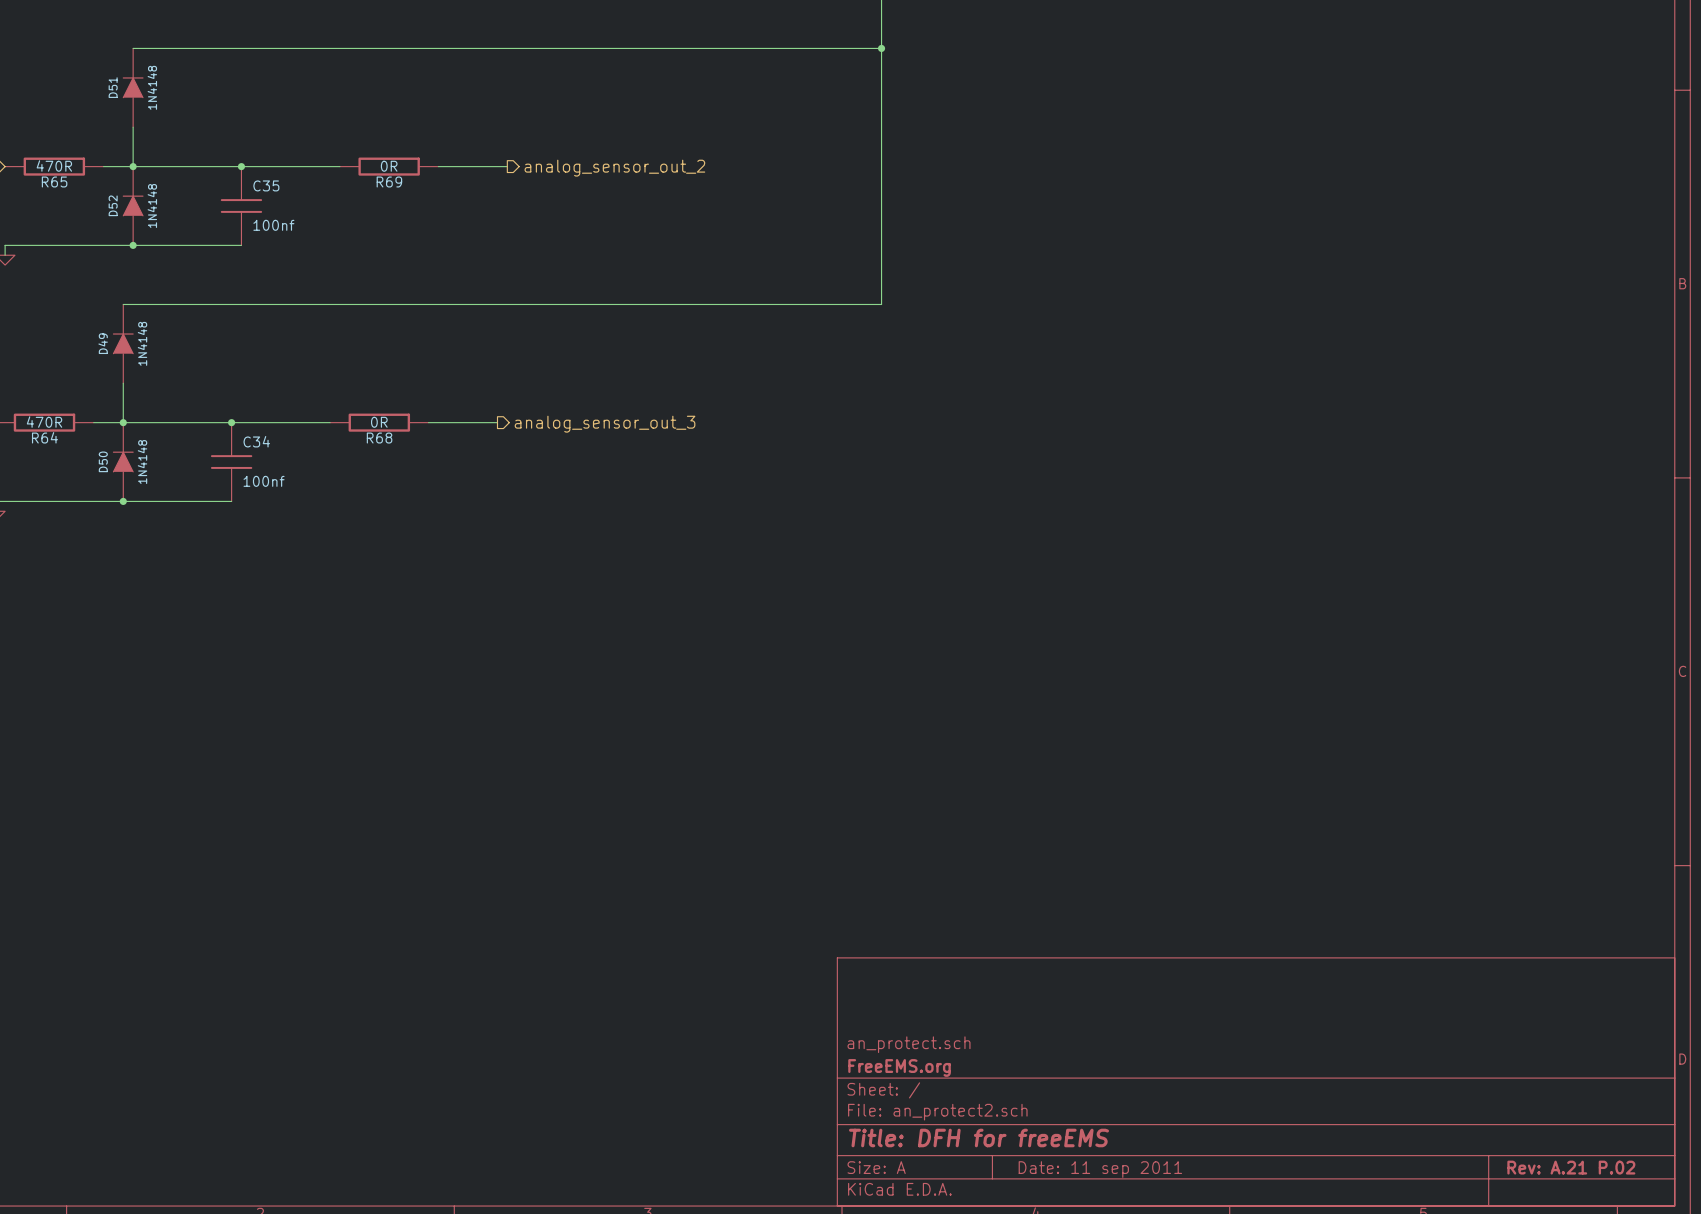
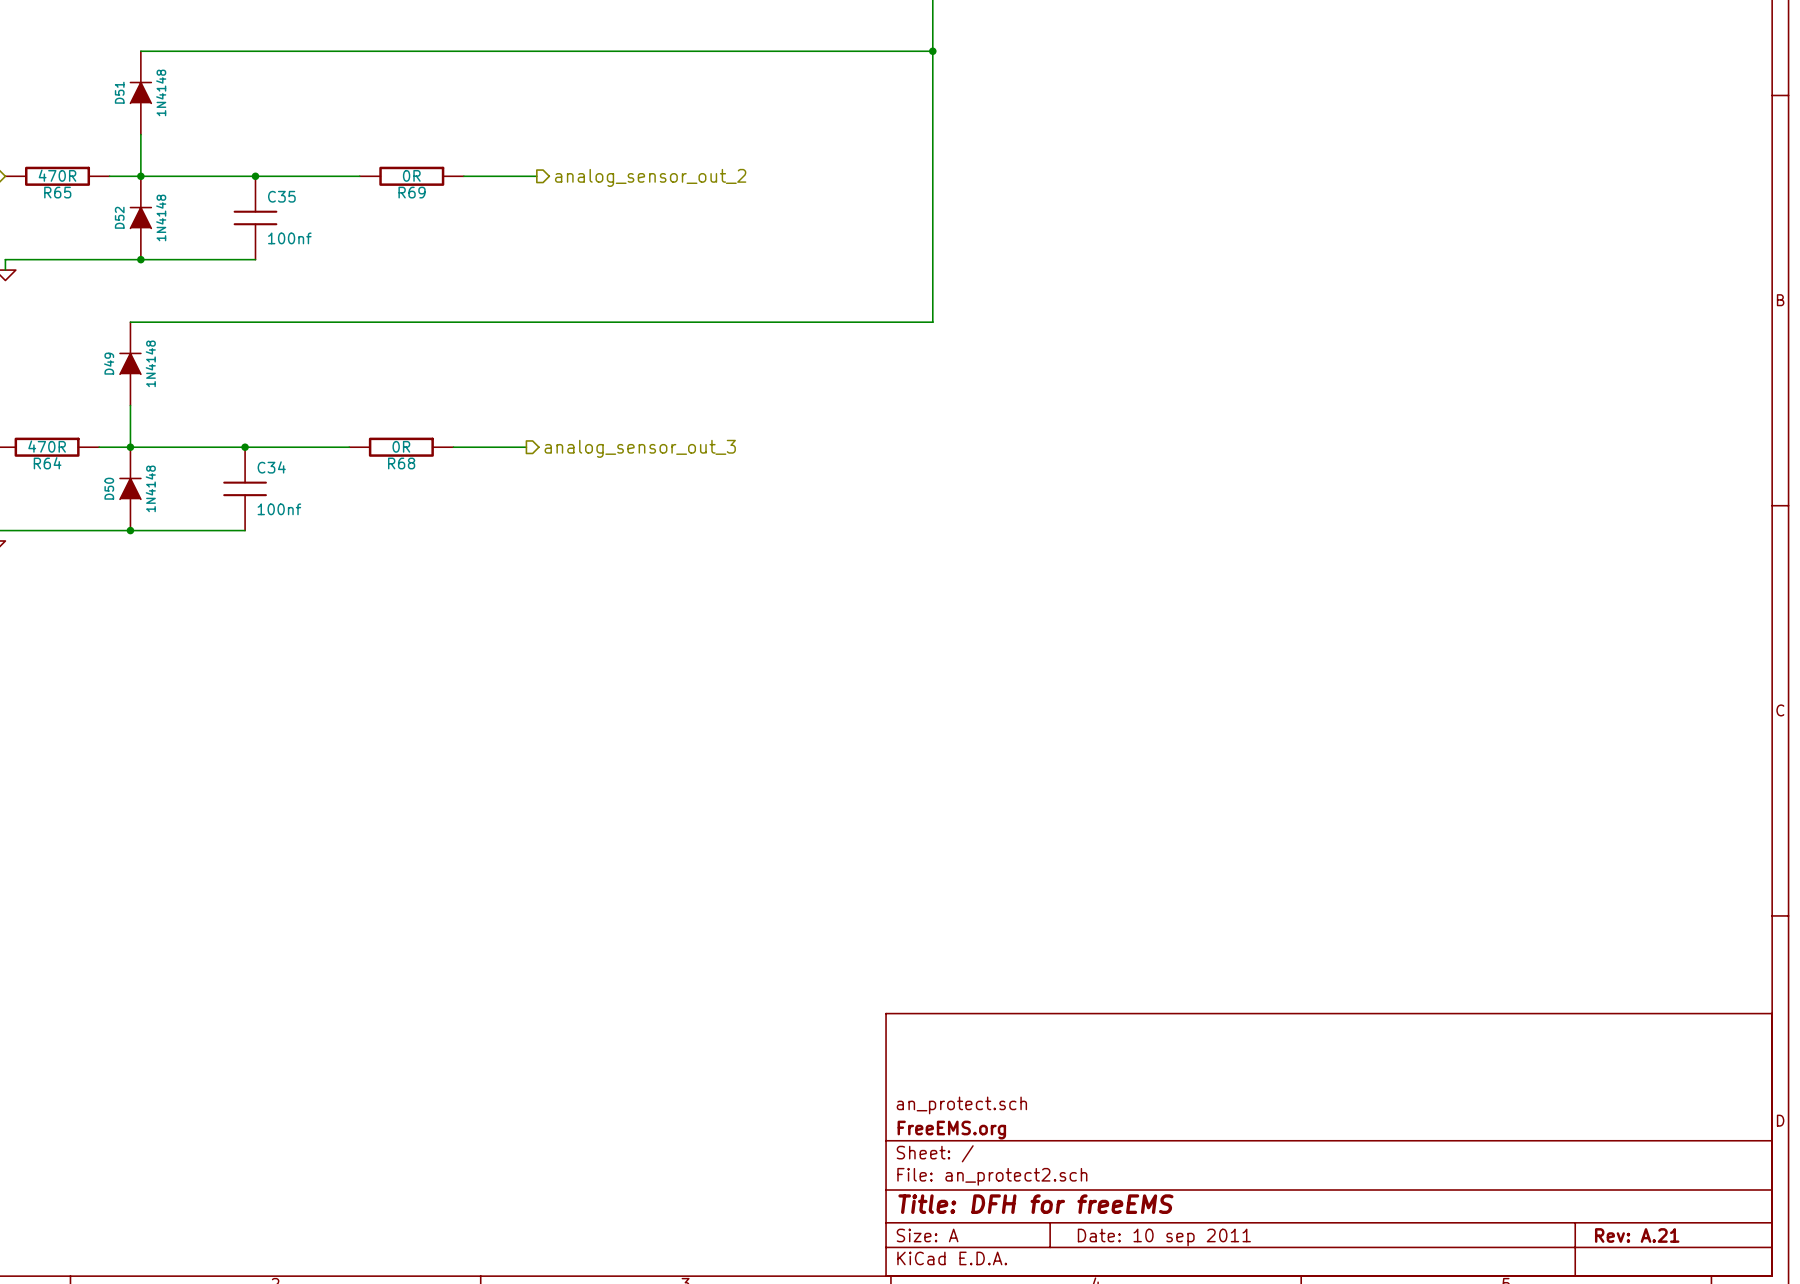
title block: Rev: A.21 P.02 (1571, 1167) -> Rev: A.21 (1637, 1235)
title block: Date: 11 sep 2011 (1100, 1169) -> Date: 10 sep 2011 (1164, 1237)

